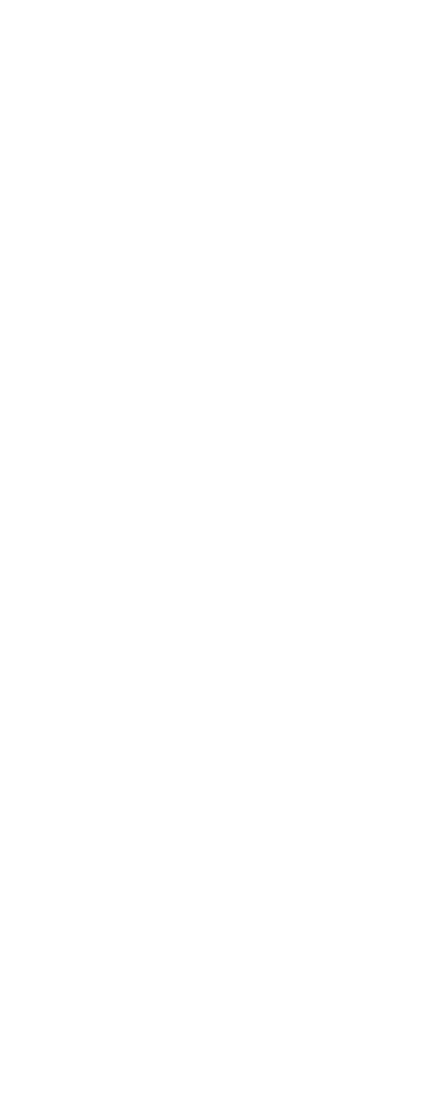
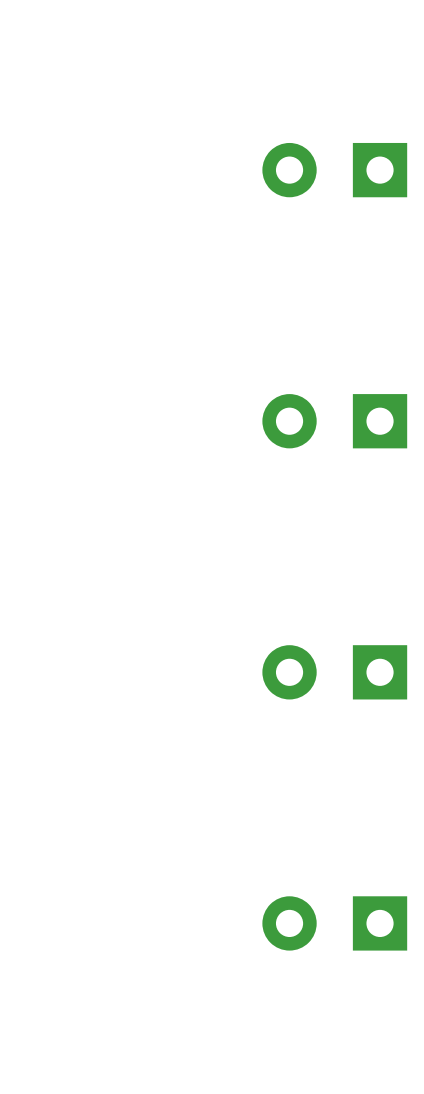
part: none -> (334, 170)
part: none -> (334, 421)
part: none -> (334, 672)
part: none -> (334, 923)

